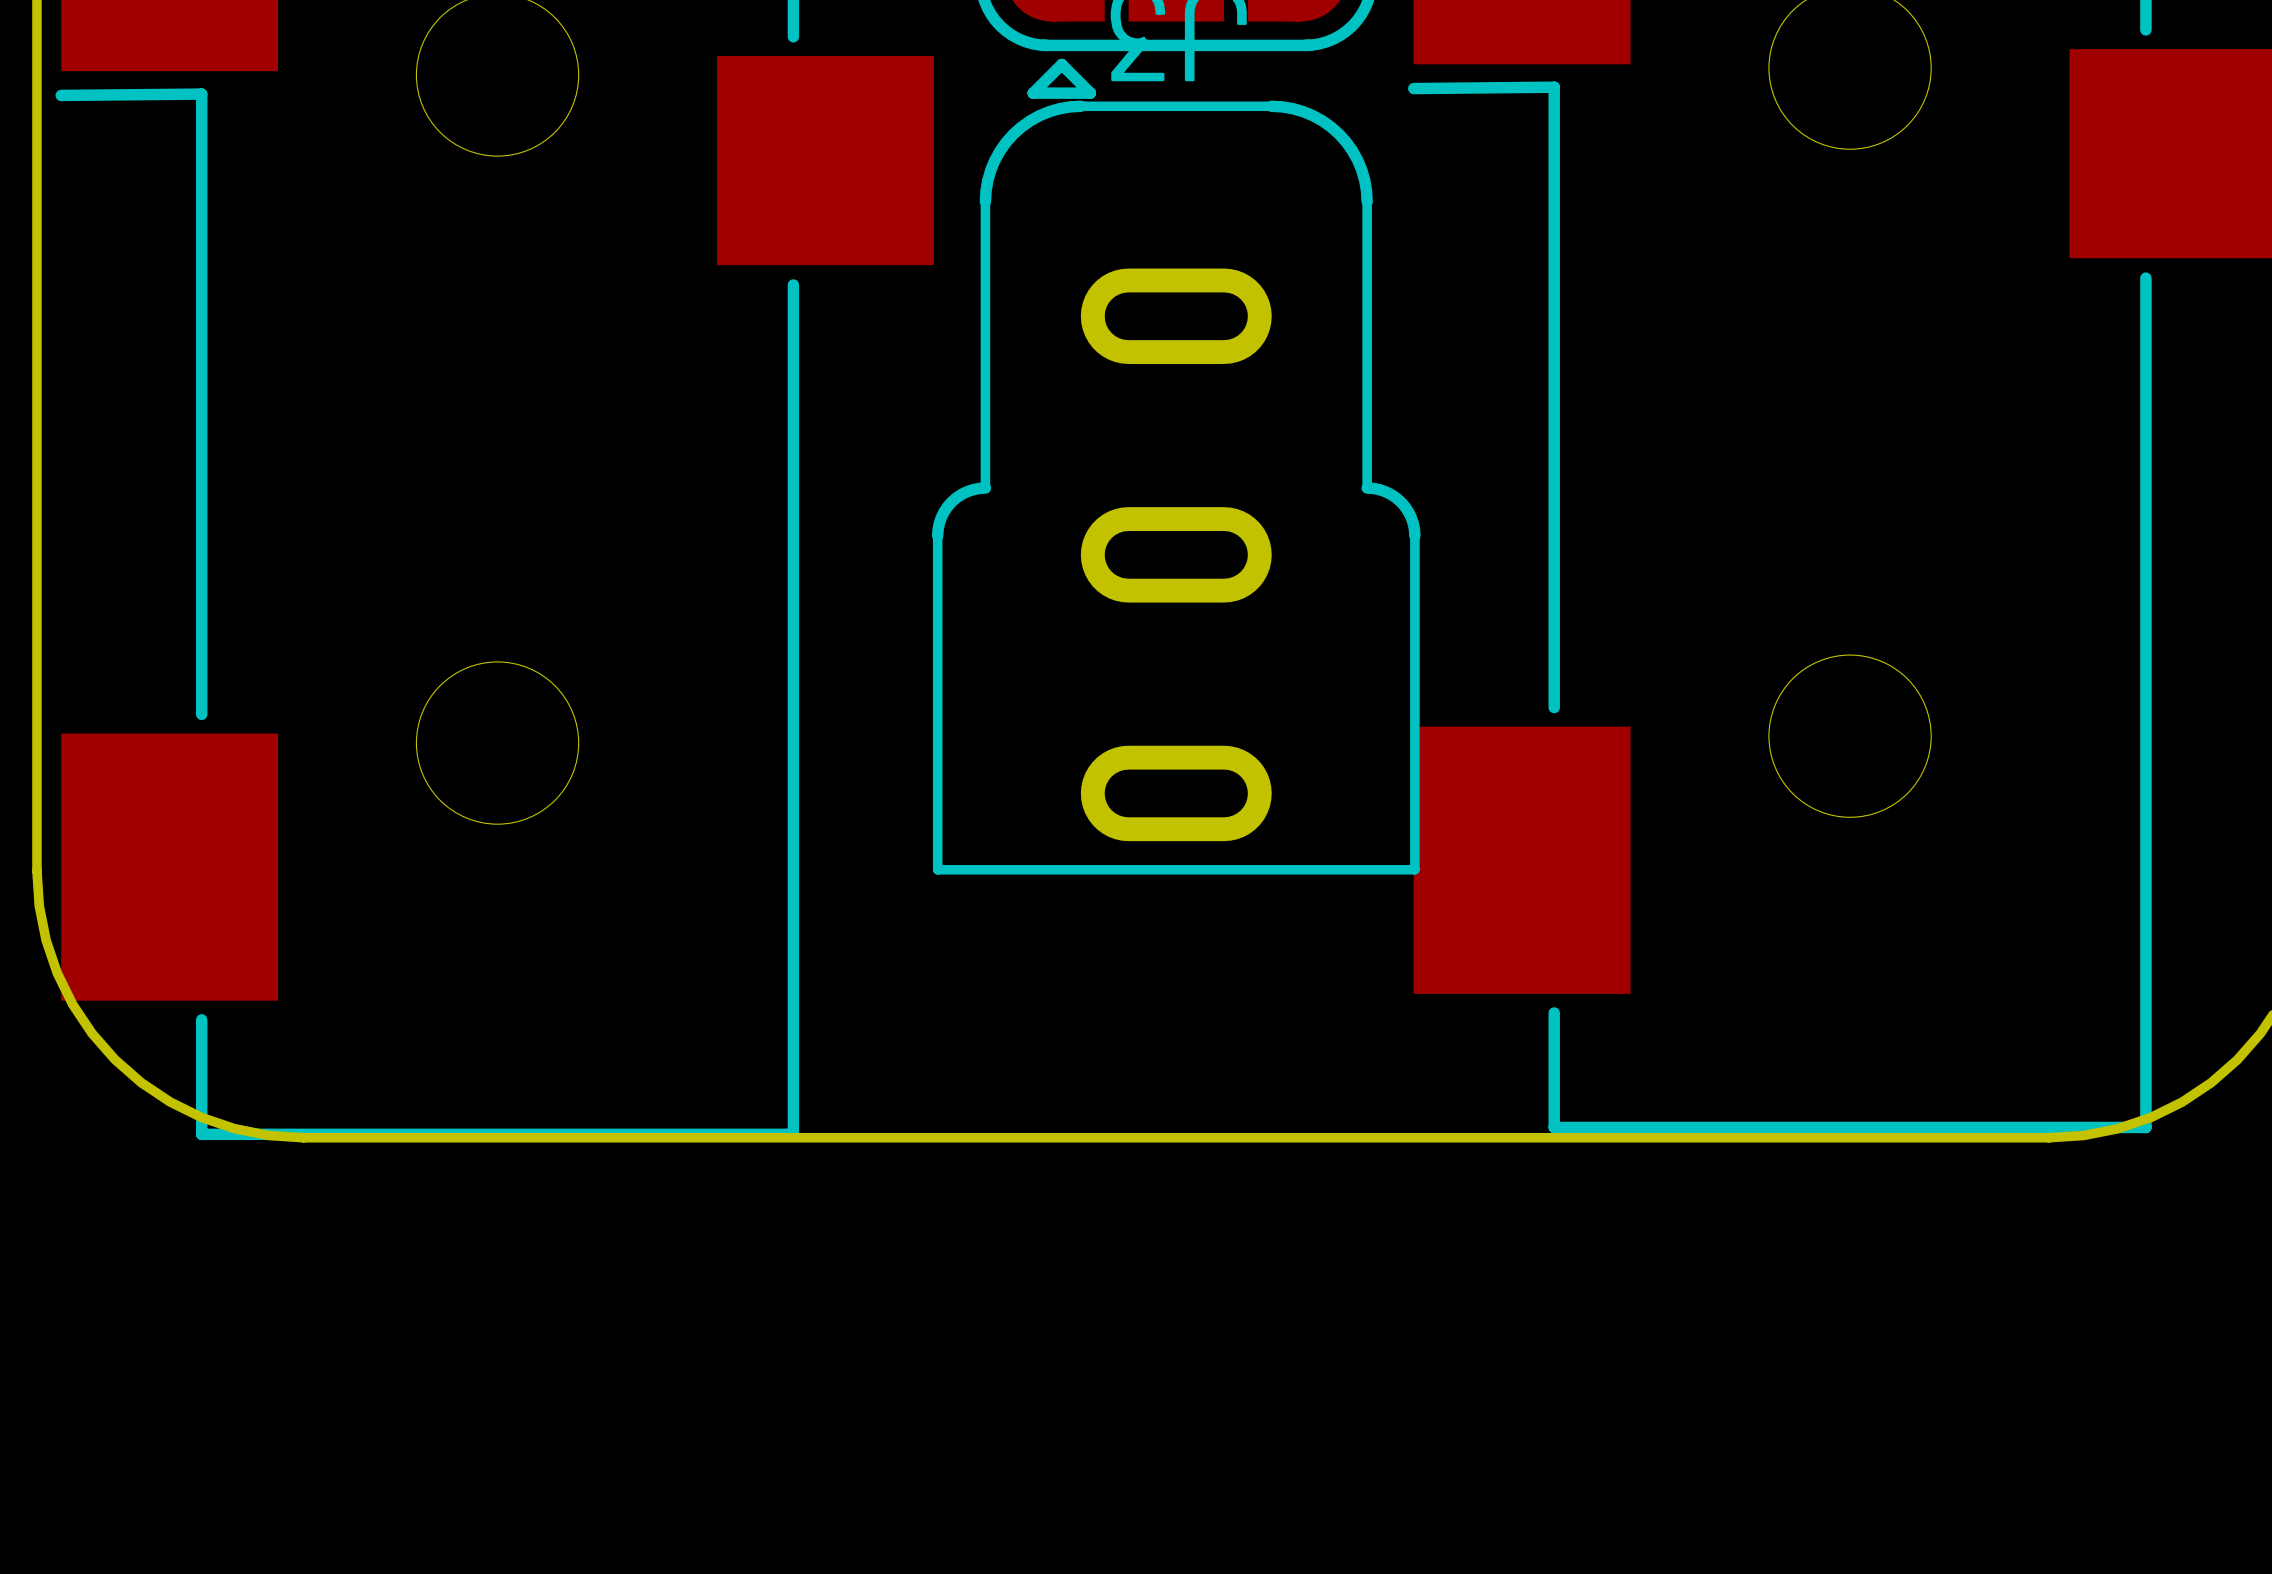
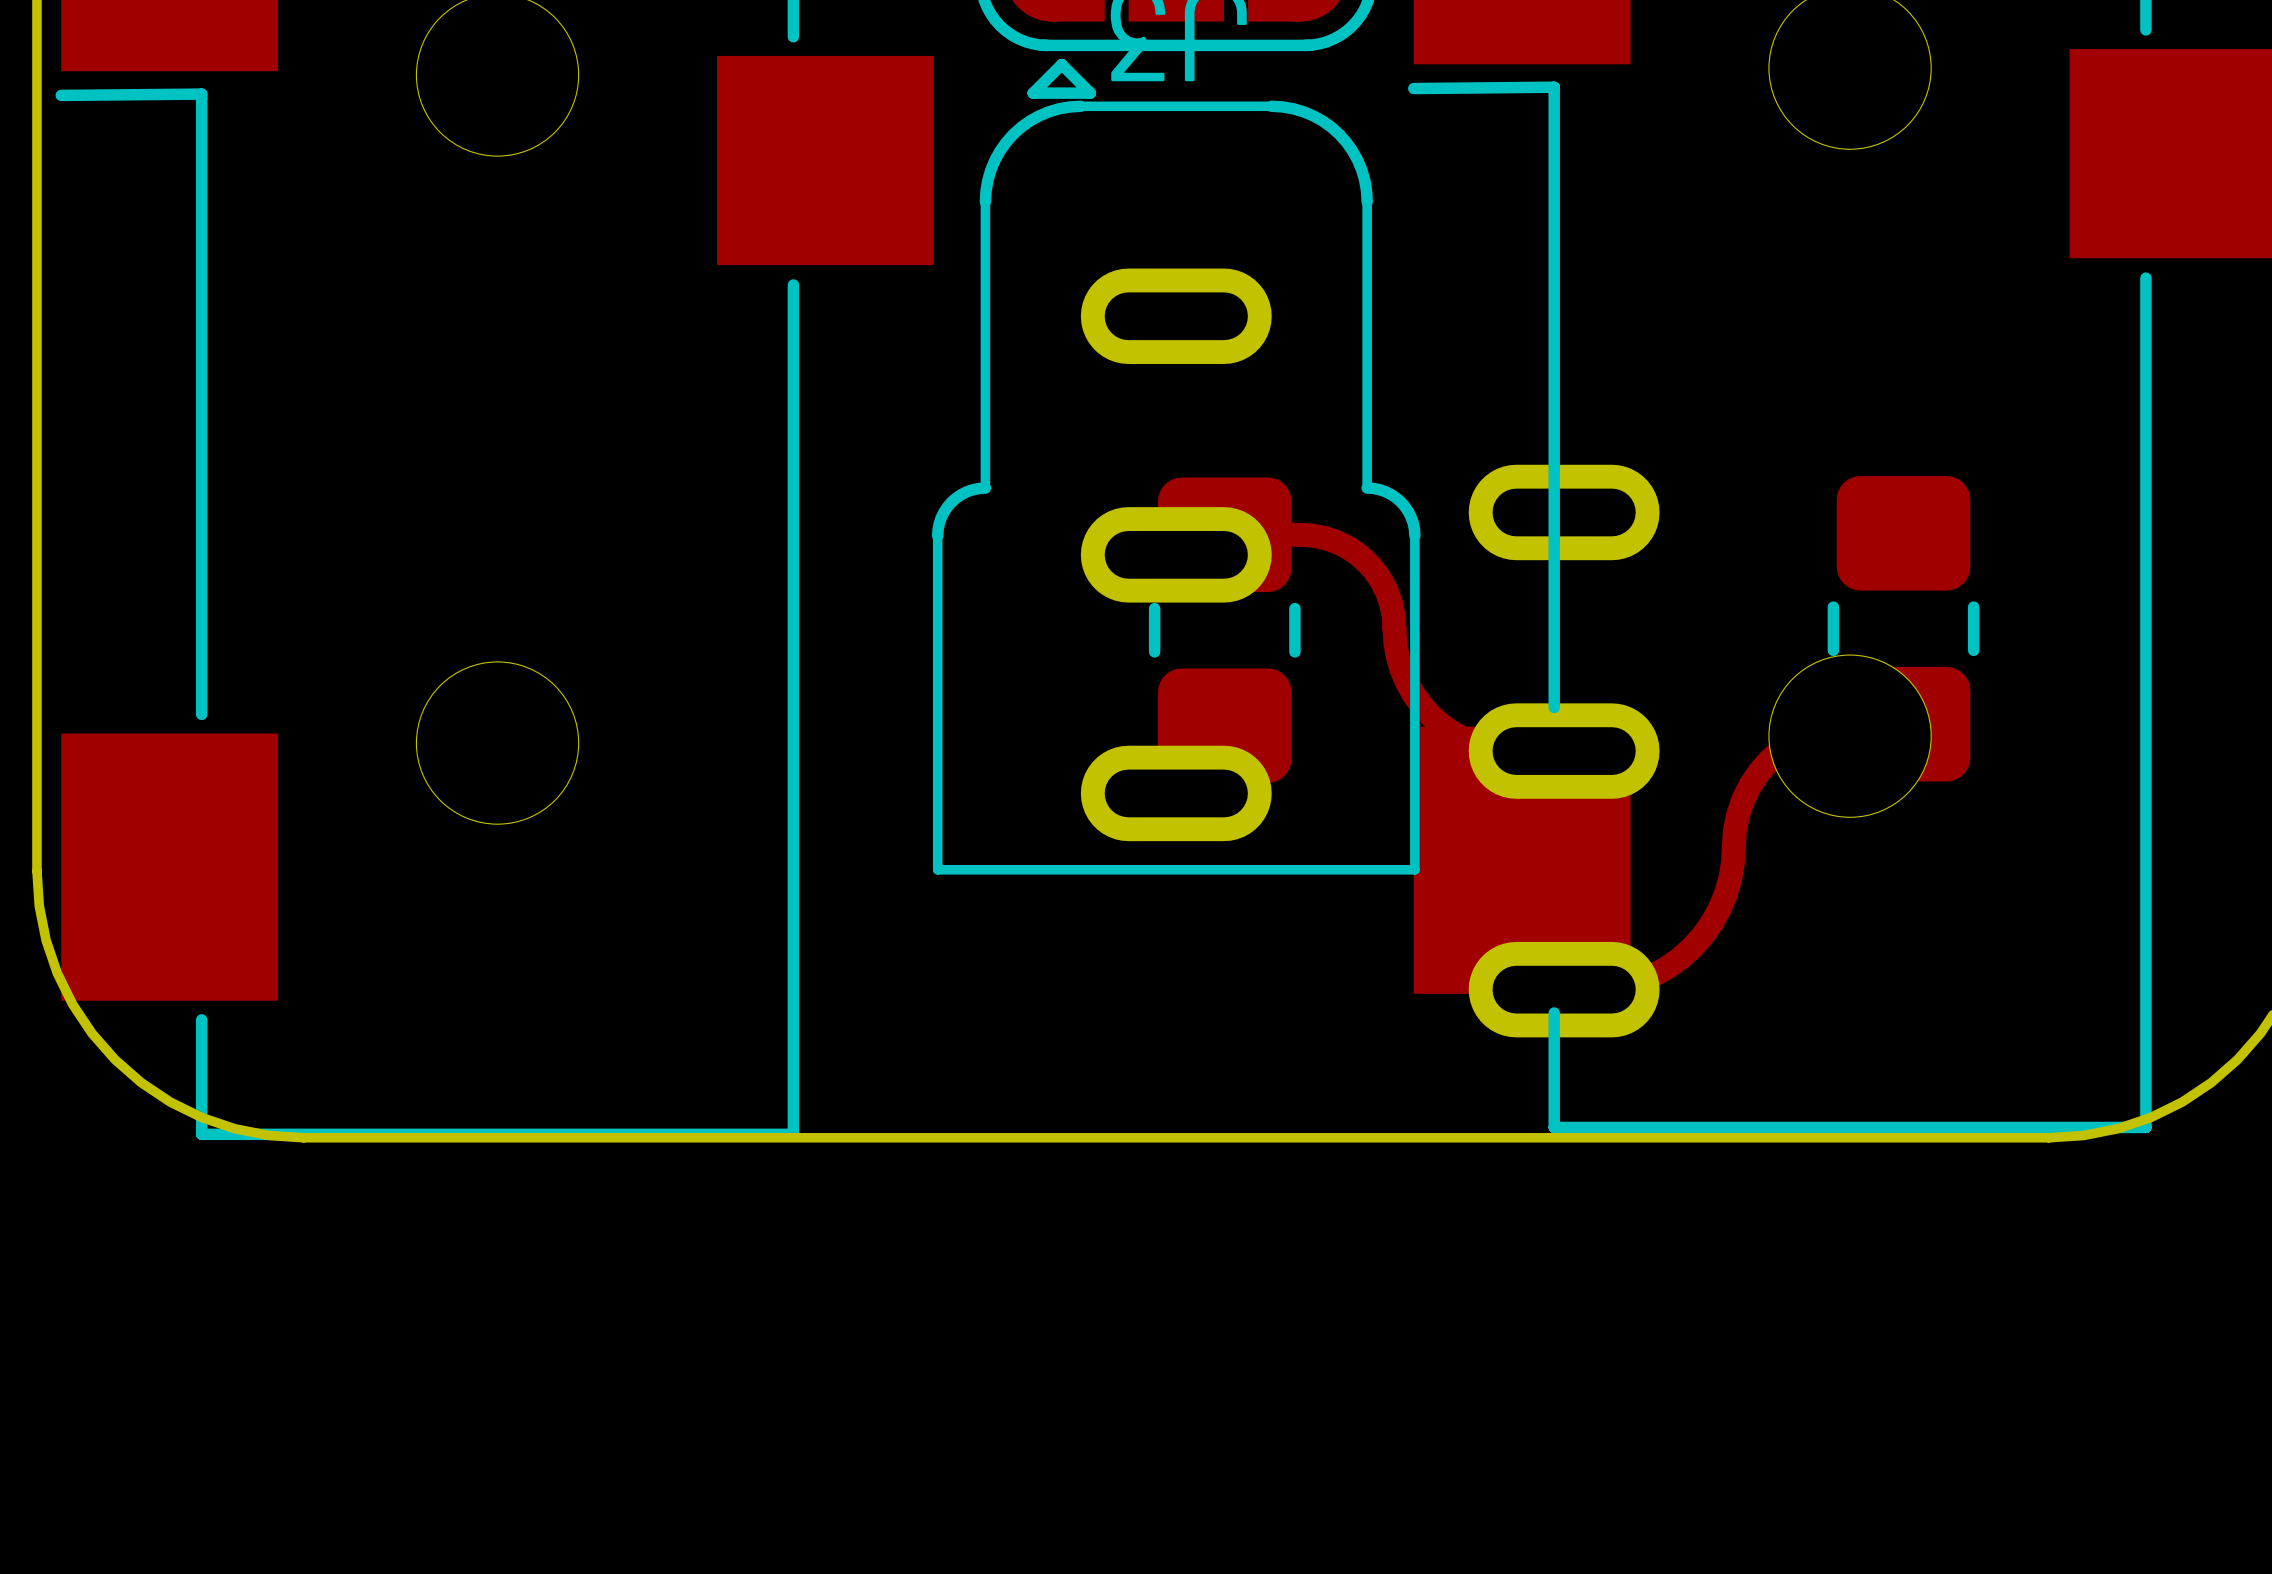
top track: none -> (1224, 534) (1312, 535) (1324, 538) (1347, 547) (1366, 562) (1381, 581) (1391, 604) (1395, 642) (1401, 669) (1413, 693) (1430, 715) (1451, 732) (1463, 738) (1489, 748) (1516, 751) (1564, 751)
part: none -> (1903, 628)
part: none -> (1224, 630)
top track: none -> (1903, 724) (1856, 724) (1824, 728) (1809, 733) (1781, 749) (1759, 772) (1743, 799) (1734, 830) (1732, 862) (1725, 894) (1711, 922) (1692, 947) (1667, 967) (1638, 981) (1607, 988) (1564, 989)
part: none -> (1564, 751)

